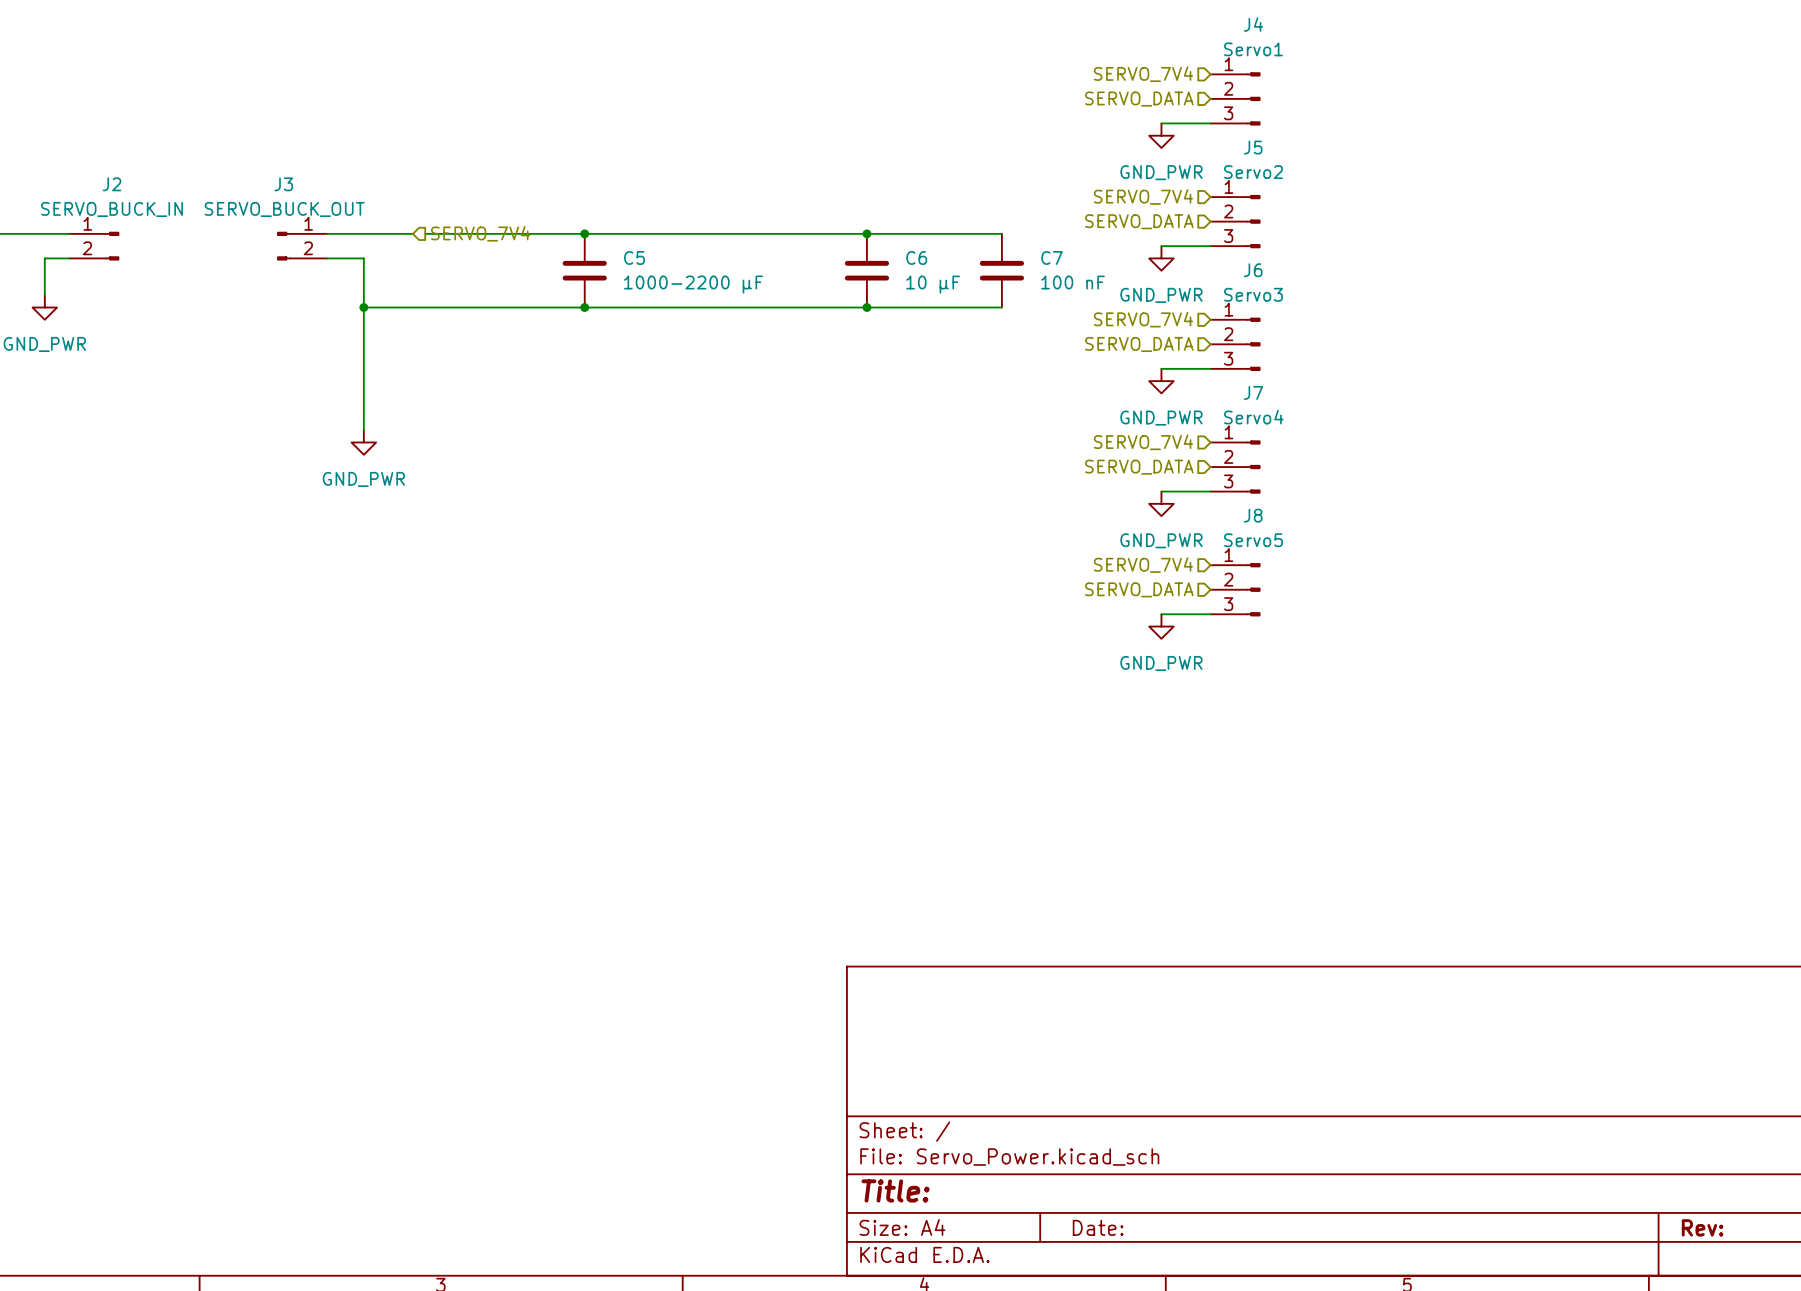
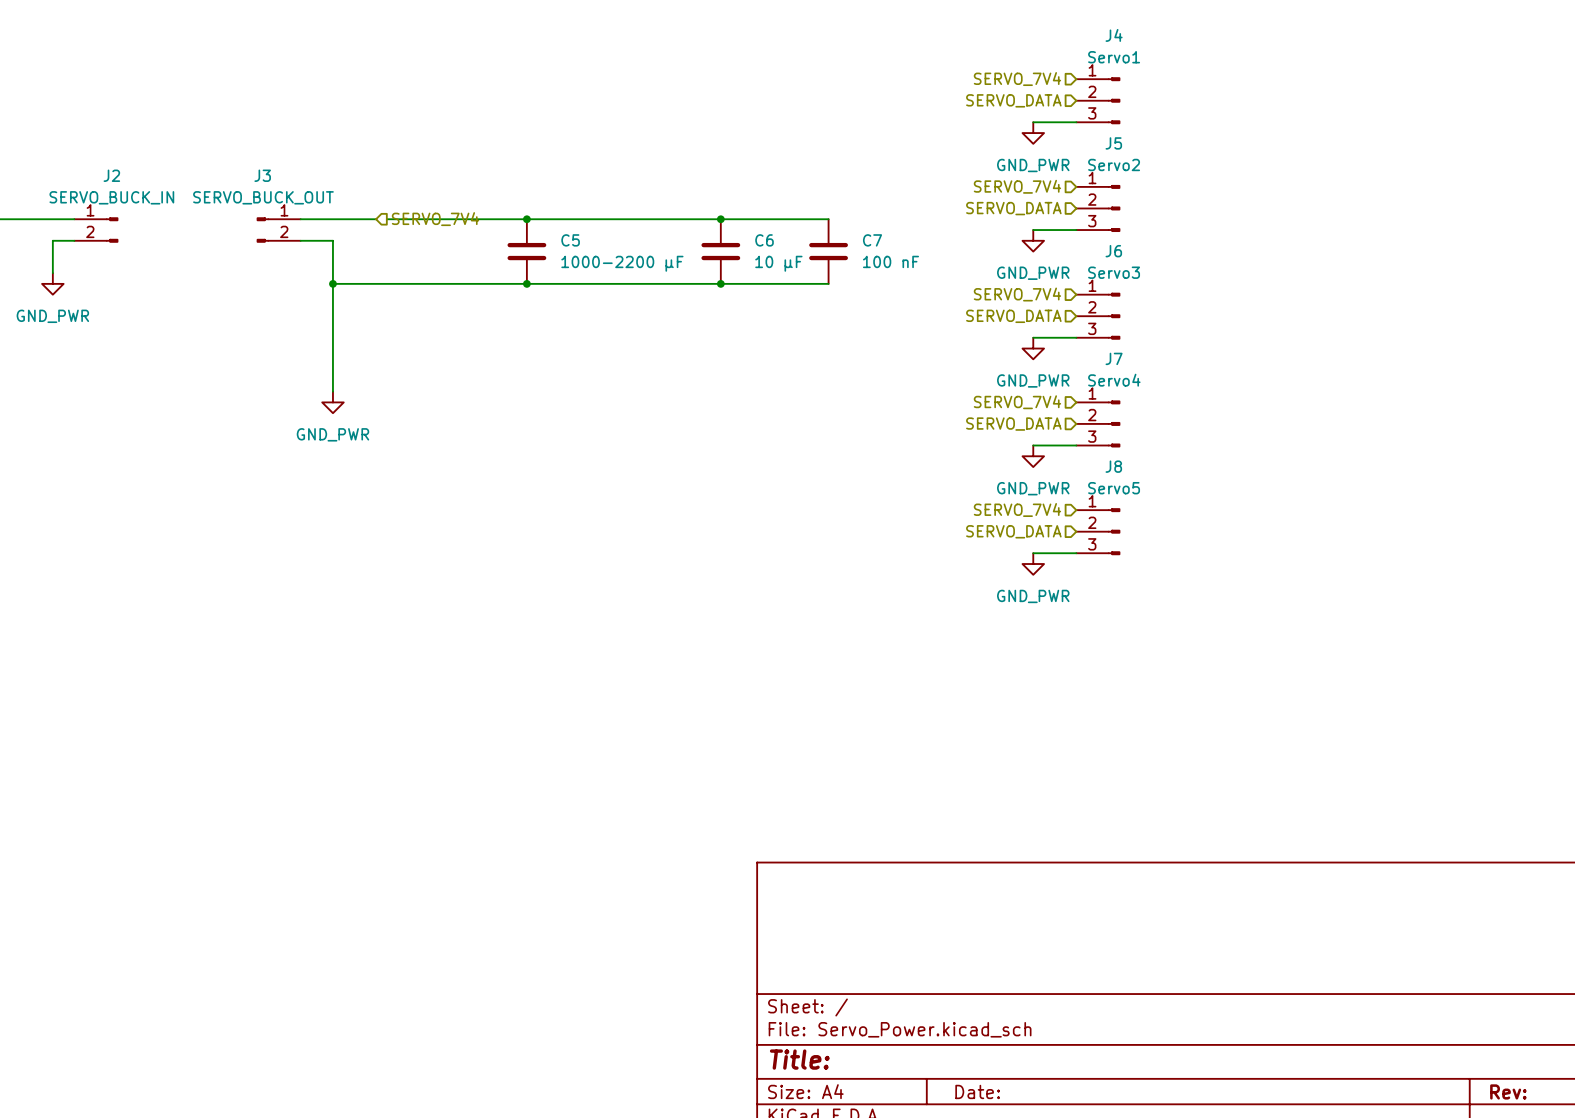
junction: none -> (720, 219)
junction: (866, 233) -> none
wire: (928, 233) (1001, 233) -> none
C6 position: (866, 270) -> (720, 251)
C7 position: (1001, 270) -> (828, 251)
junction: none -> (720, 283)
junction: (866, 307) -> none
wire: (928, 307) (1001, 307) -> none

